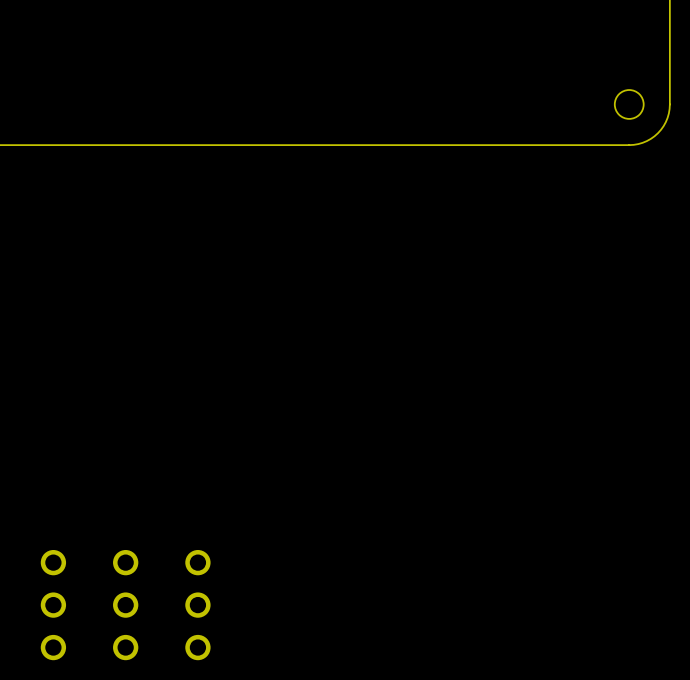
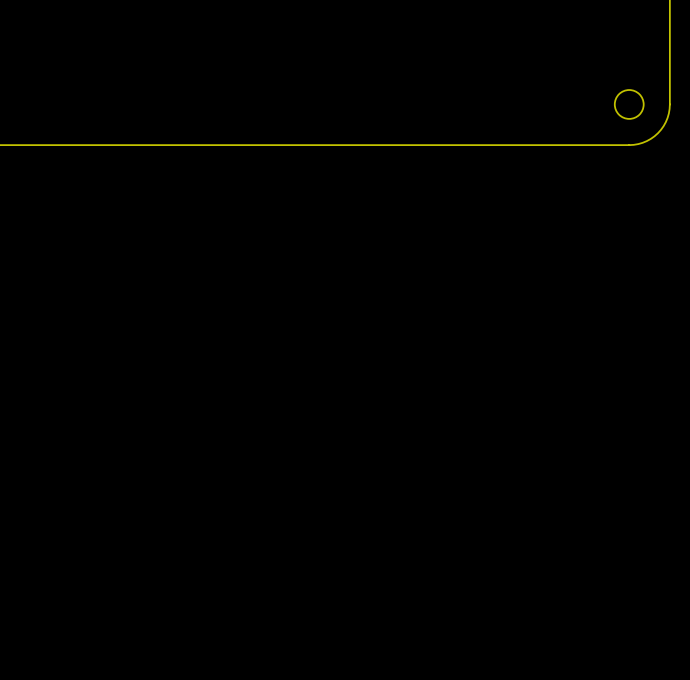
part: (53, 605) -> none
part: (125, 605) -> none
part: (197, 605) -> none

